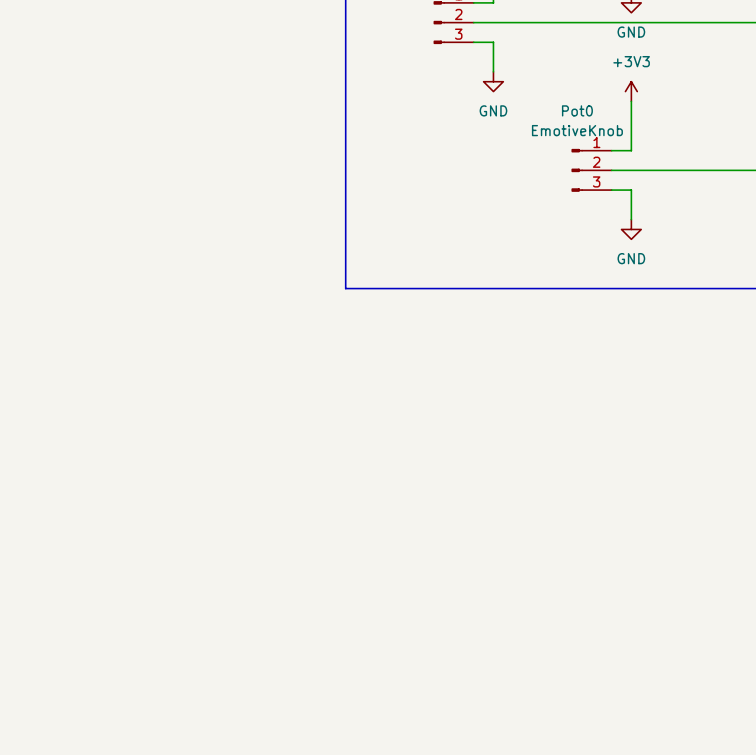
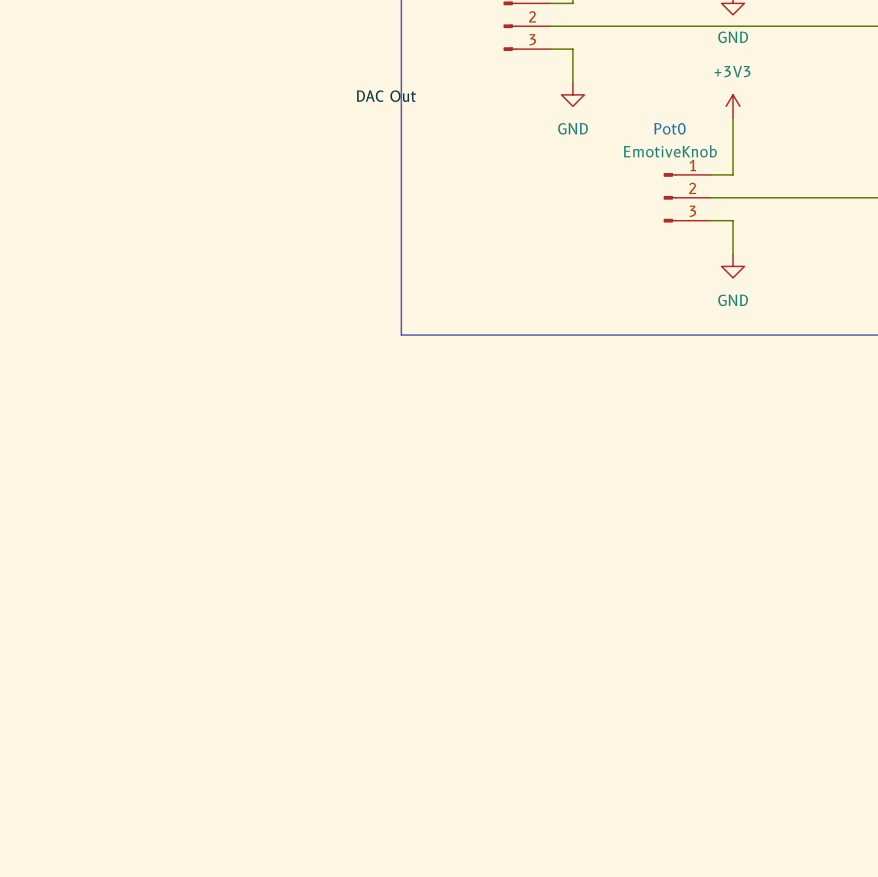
label: none -> DAC Out (386, 96)

